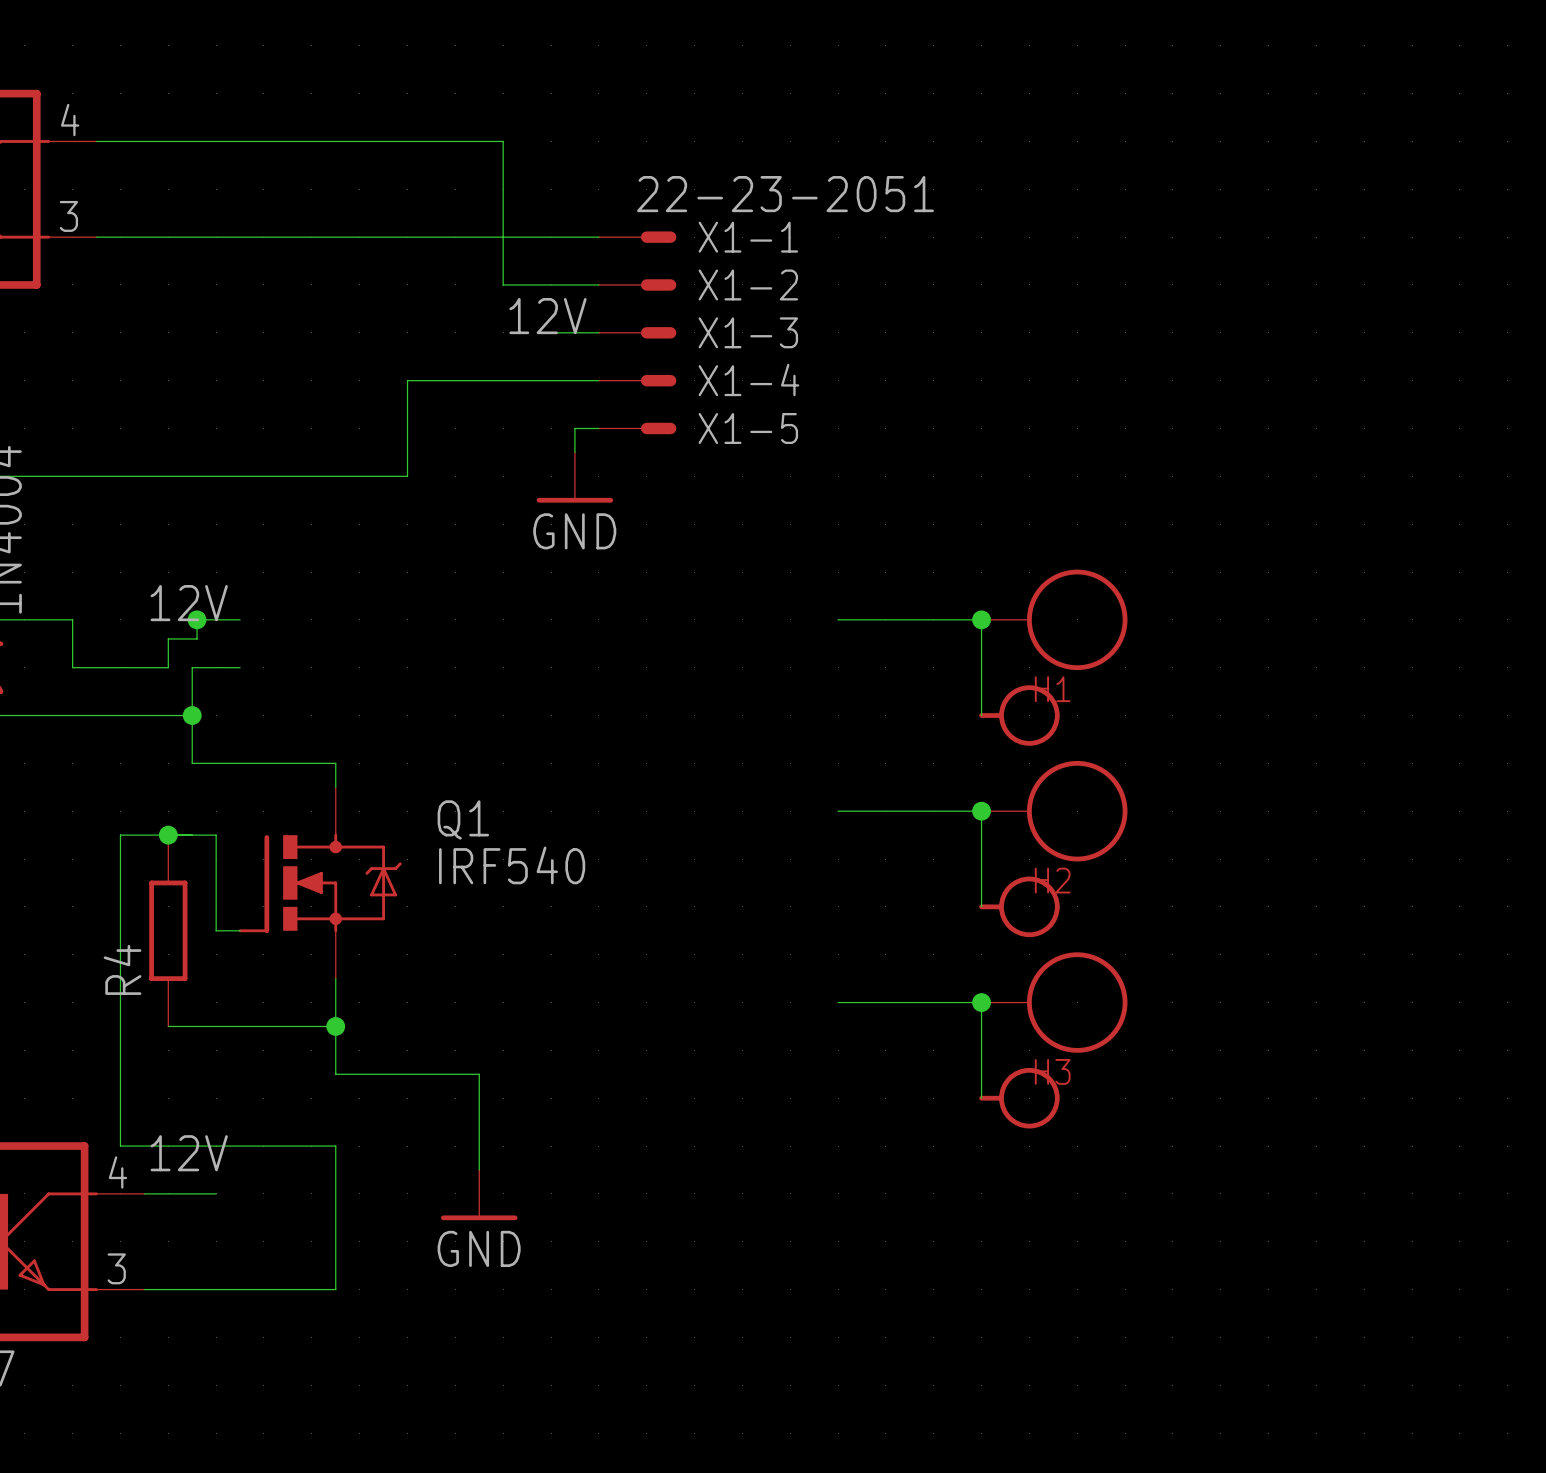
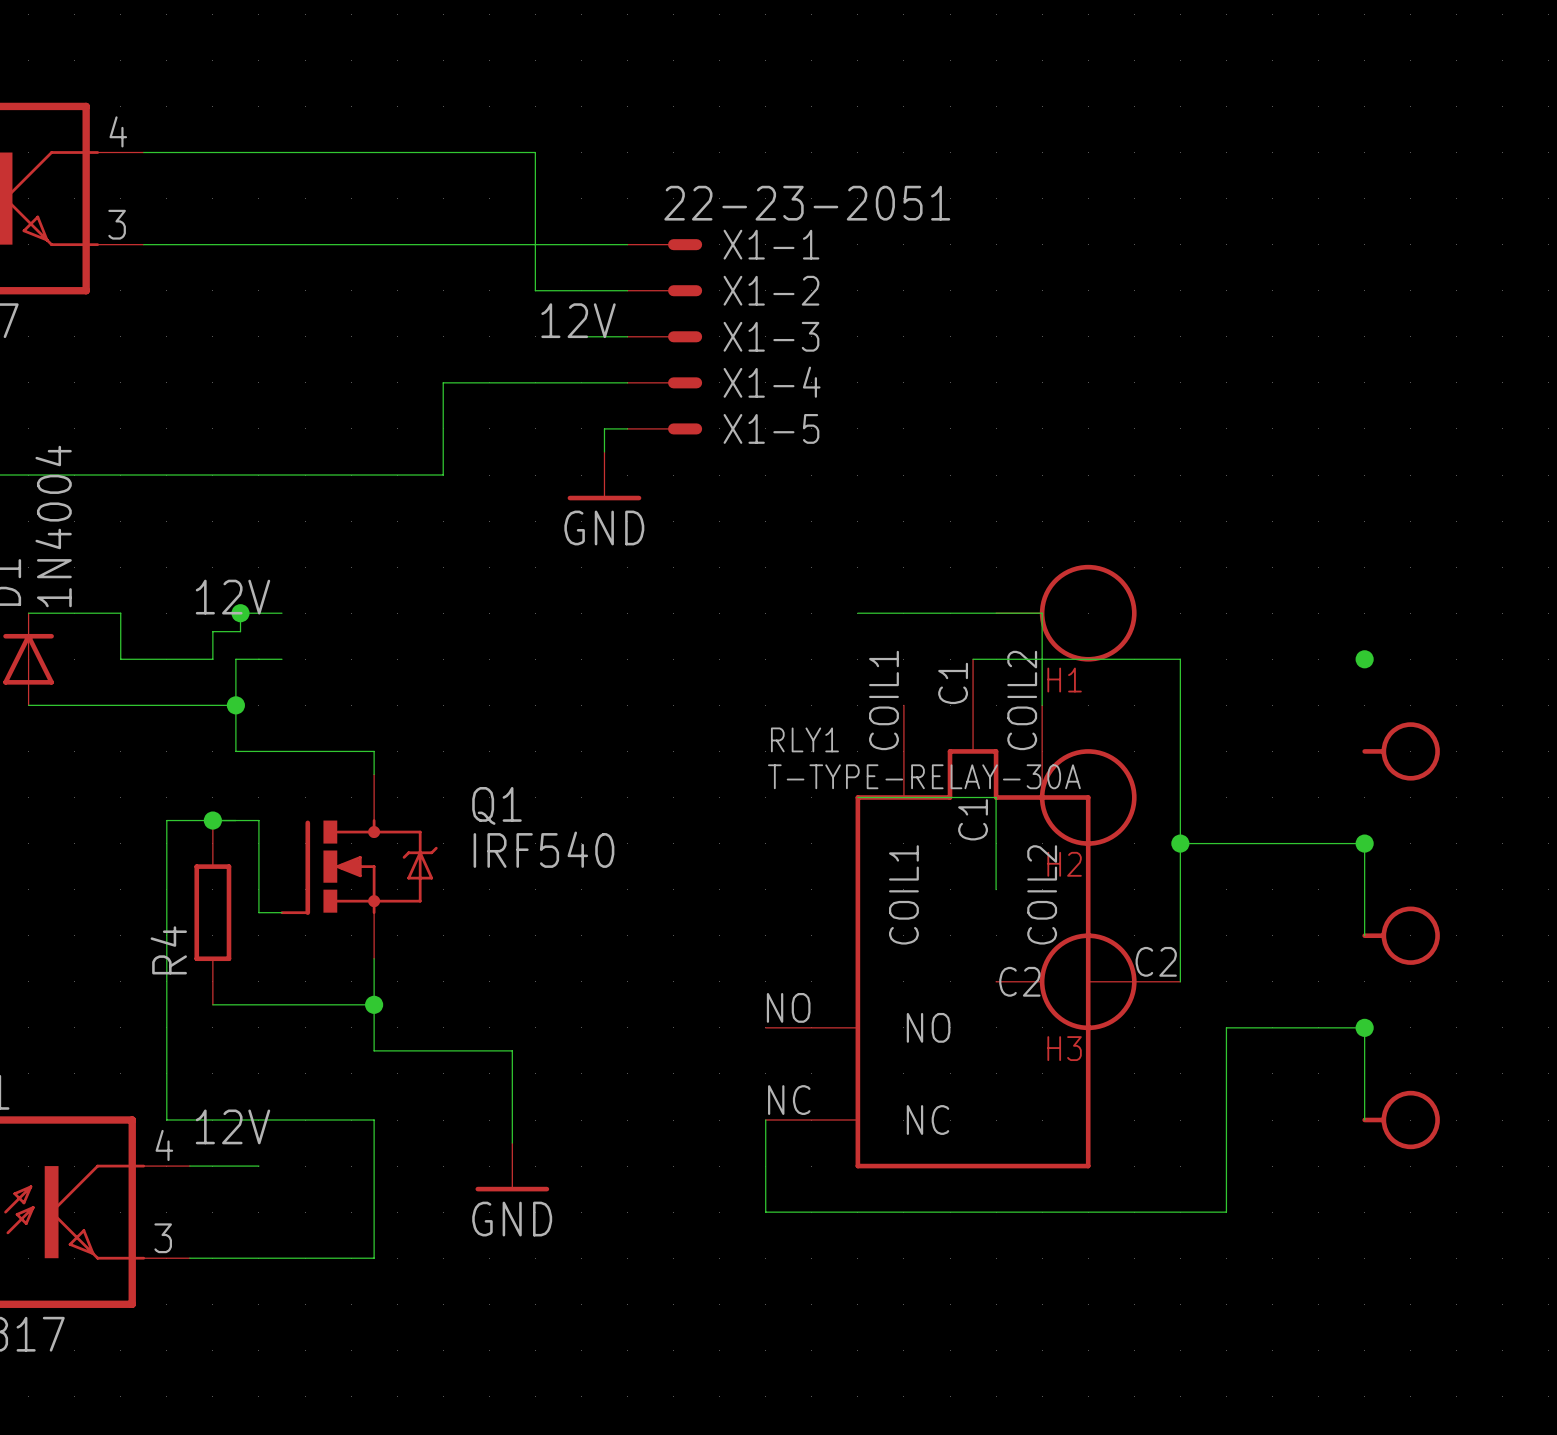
wire: (981, 619) (981, 715) -> (996, 613) (1042, 613) (1042, 705)
junction: (981, 619) -> none
wire: none -> (973, 659) (1180, 659) (1180, 981)
junction: none -> (1364, 659)
part: (1019, 715) -> none
part: none -> (1401, 751)
junction: (981, 811) -> none
wire: none -> (1180, 843) (1364, 843) (1364, 935)
junction: none -> (1180, 843)
junction: none -> (1364, 843)
part: (1019, 906) -> none
RLY1: none -> T-TYPE-RELAY-30A (973, 913)
part: none -> (1401, 935)
wire: (838, 1002) (981, 1002) (981, 1098) -> none
junction: (981, 1002) -> none
junction: none -> (1364, 1027)
part: (1019, 1098) -> none
wire: none -> (765, 1120) (765, 1212) (1226, 1212) (1226, 1027) (1364, 1027) (1364, 1120)
part: none -> (1401, 1120)

